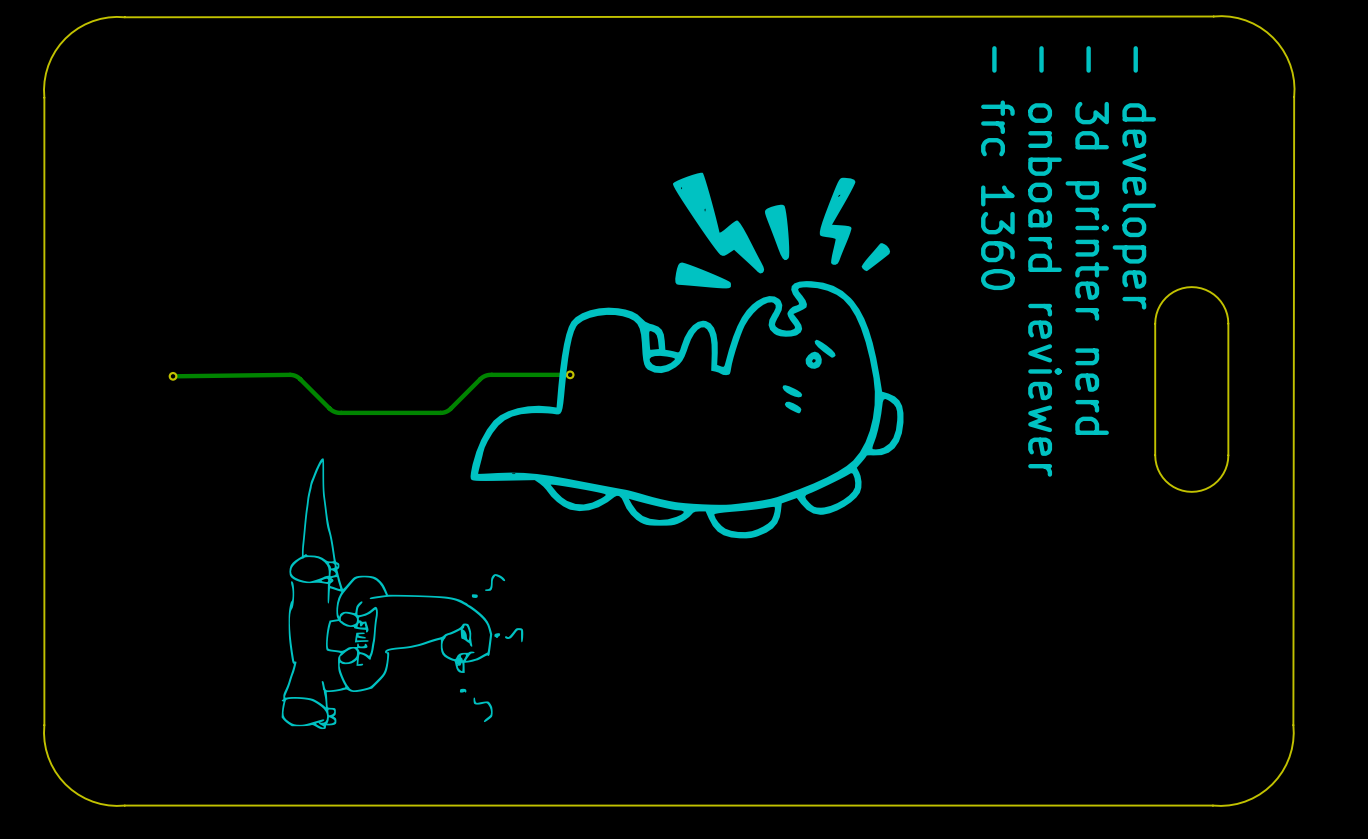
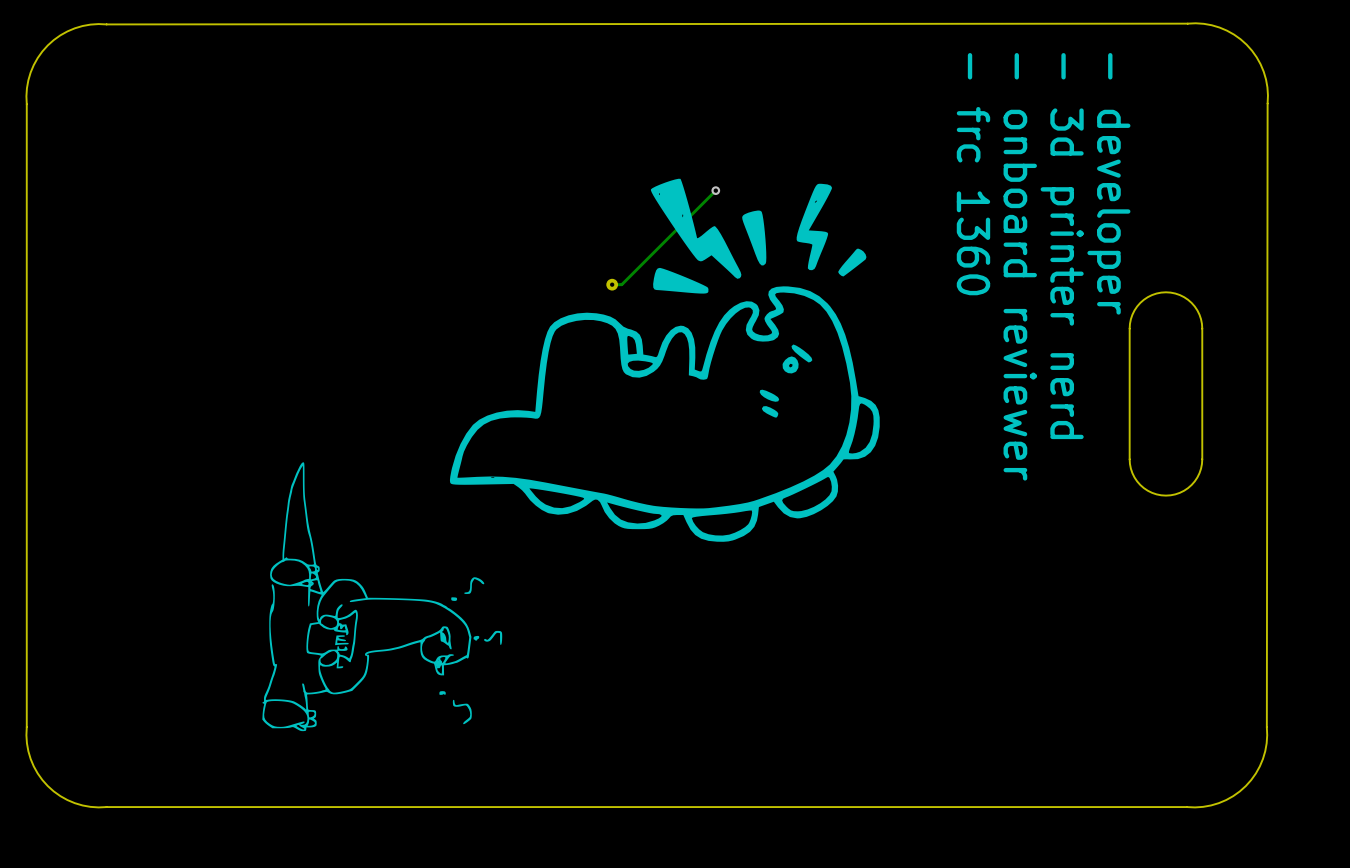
track: none -> (715, 190) (621, 284) (612, 284)
via: none -> (715, 190)
part: none -> (612, 284)
part: (371, 392) -> none

